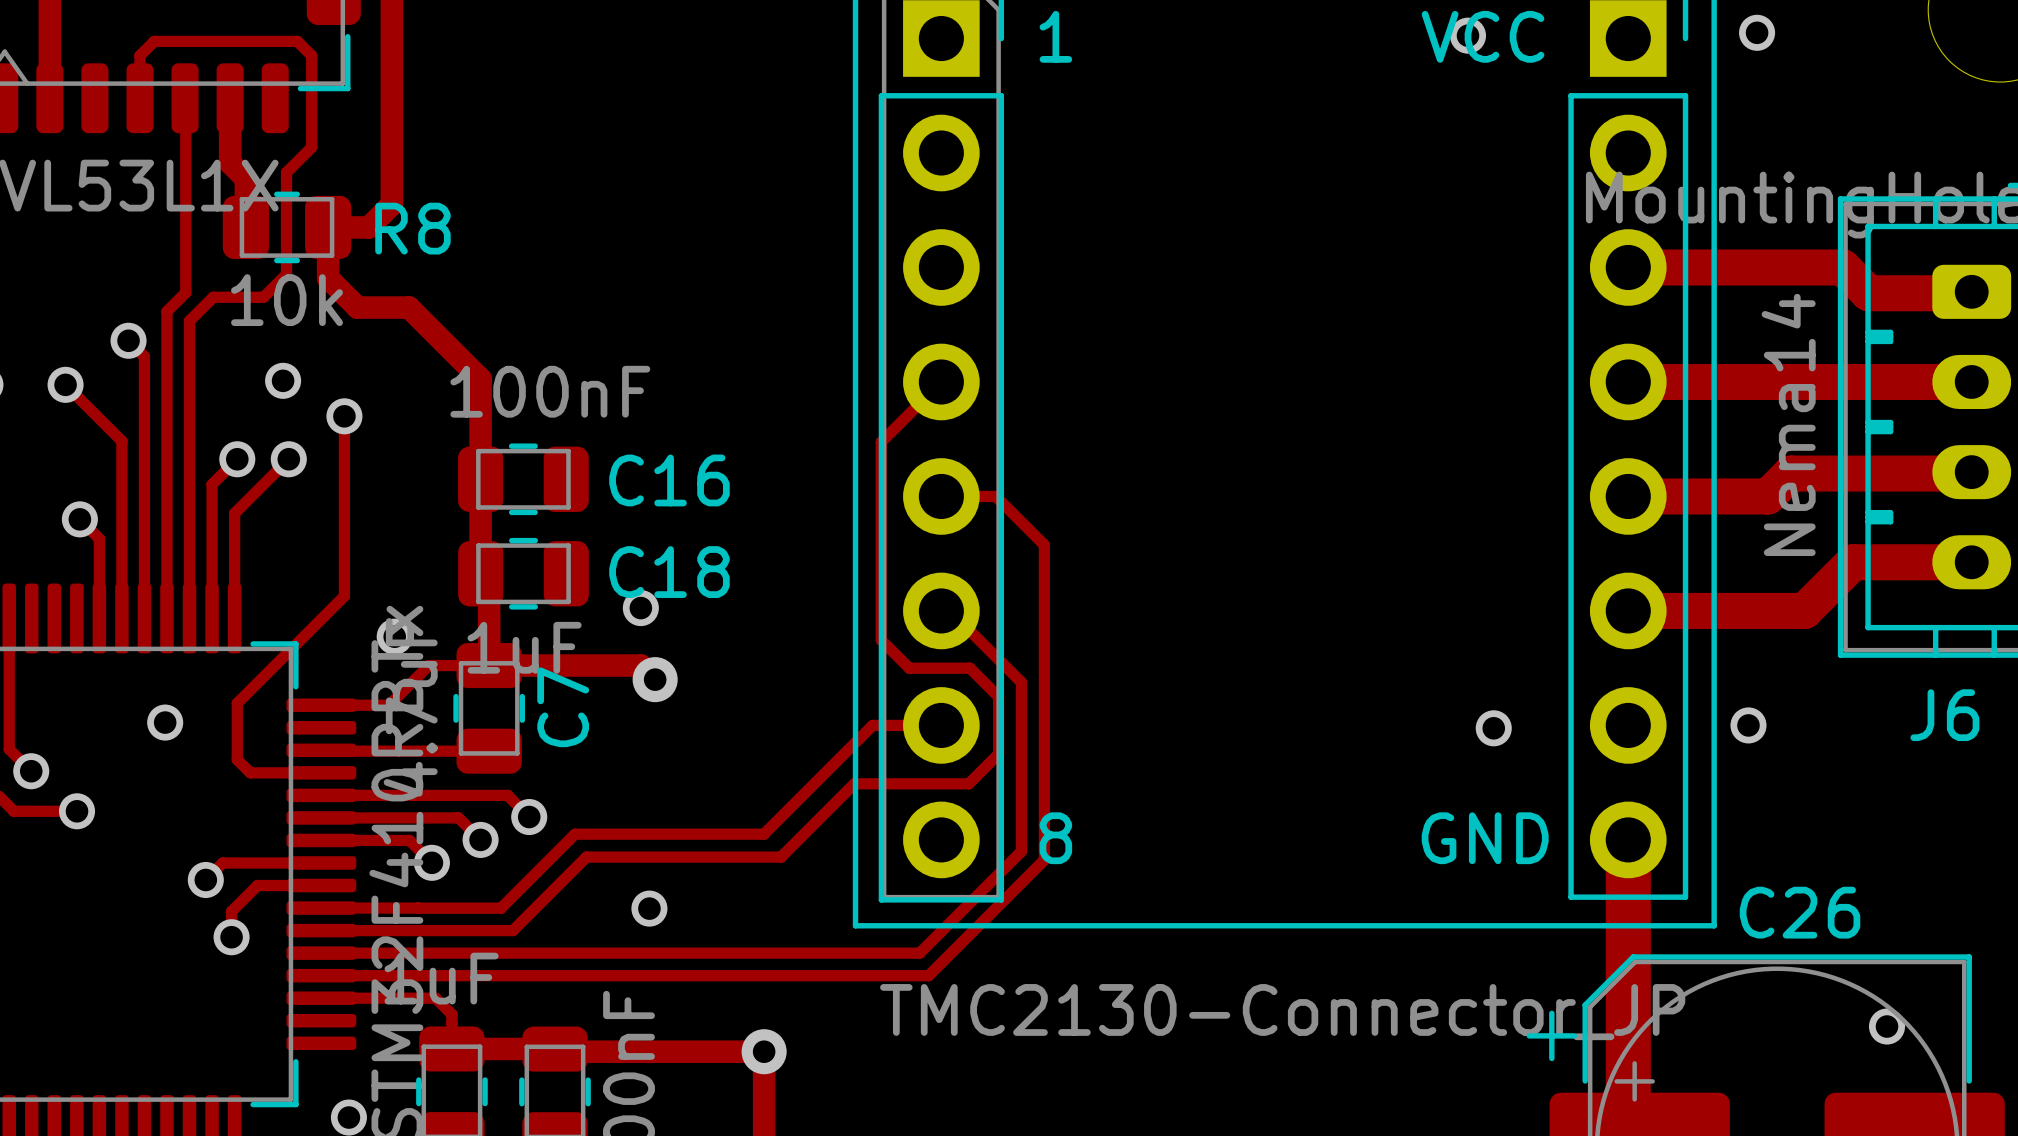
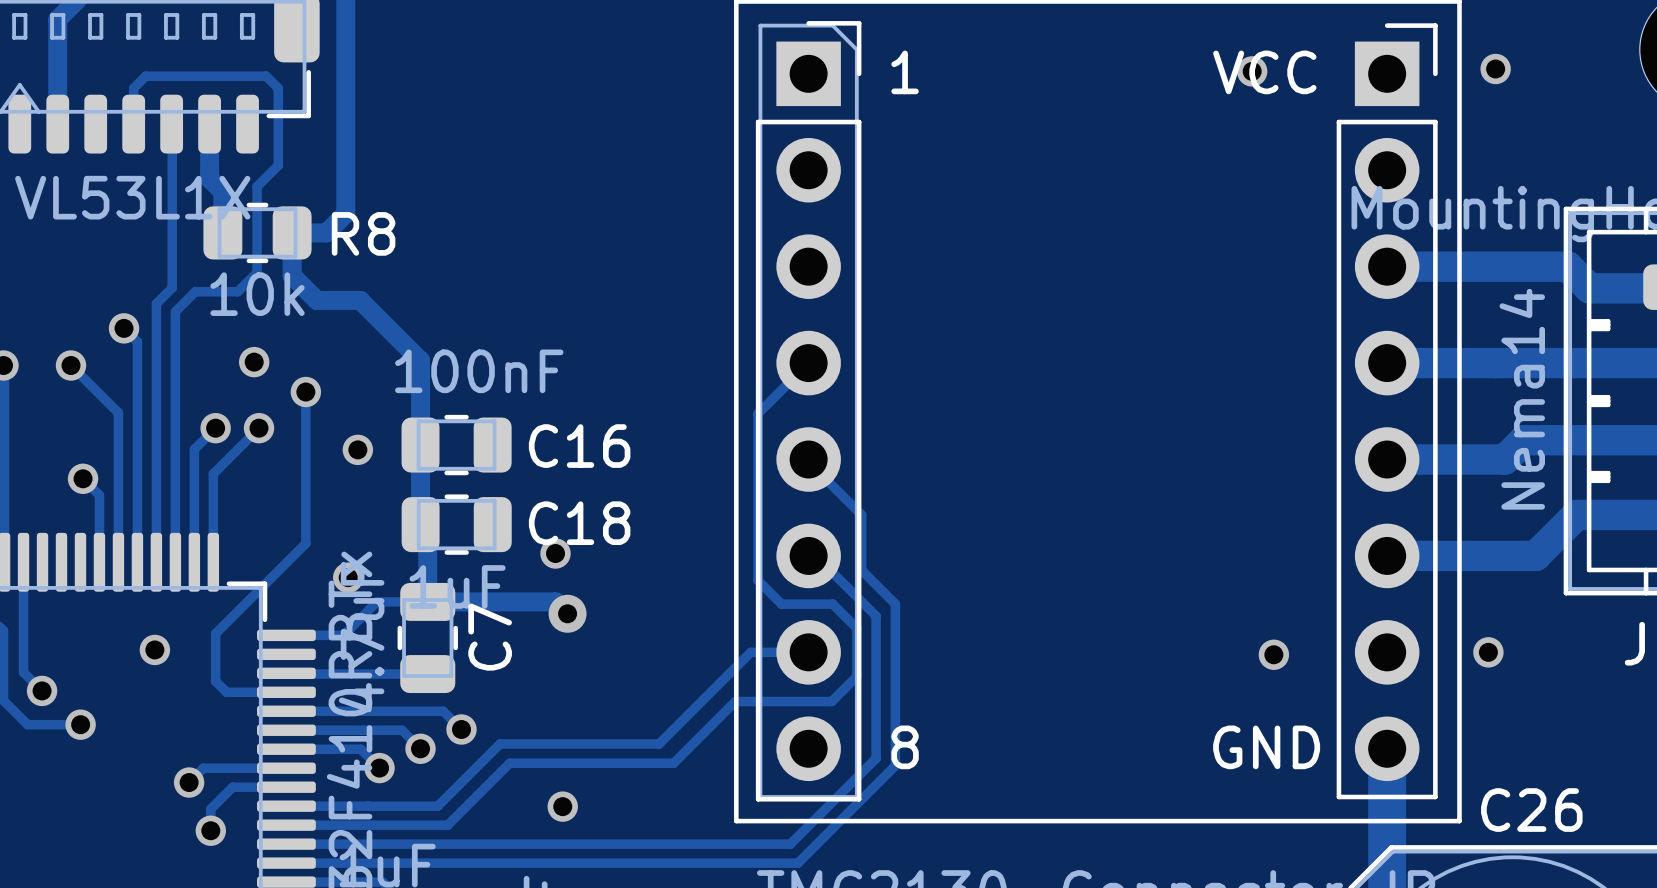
via: none -> (357, 449)
track: (964, 496) (995, 496) (1044, 545) (1044, 668) -> (808, 459) (808, 461) (861, 514) (861, 570) (895, 604)

